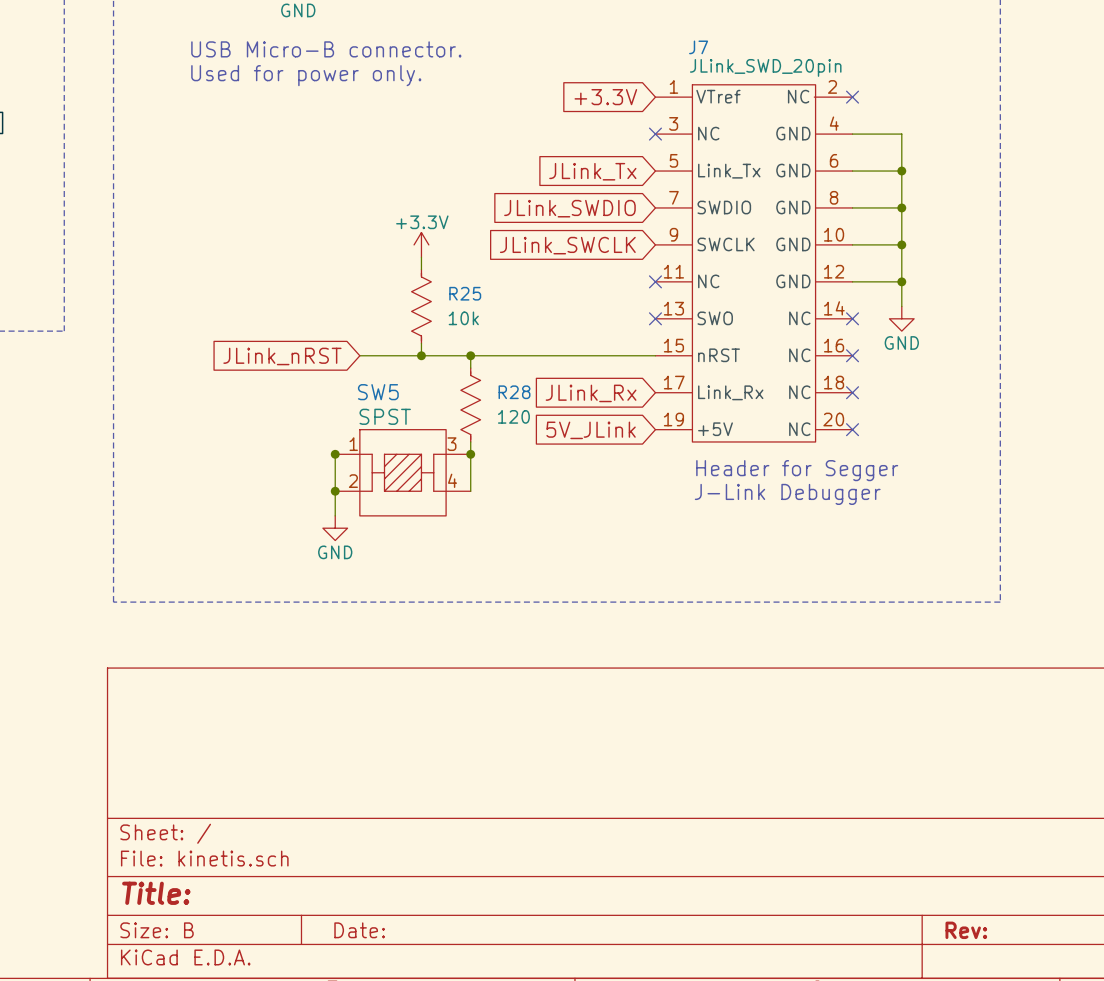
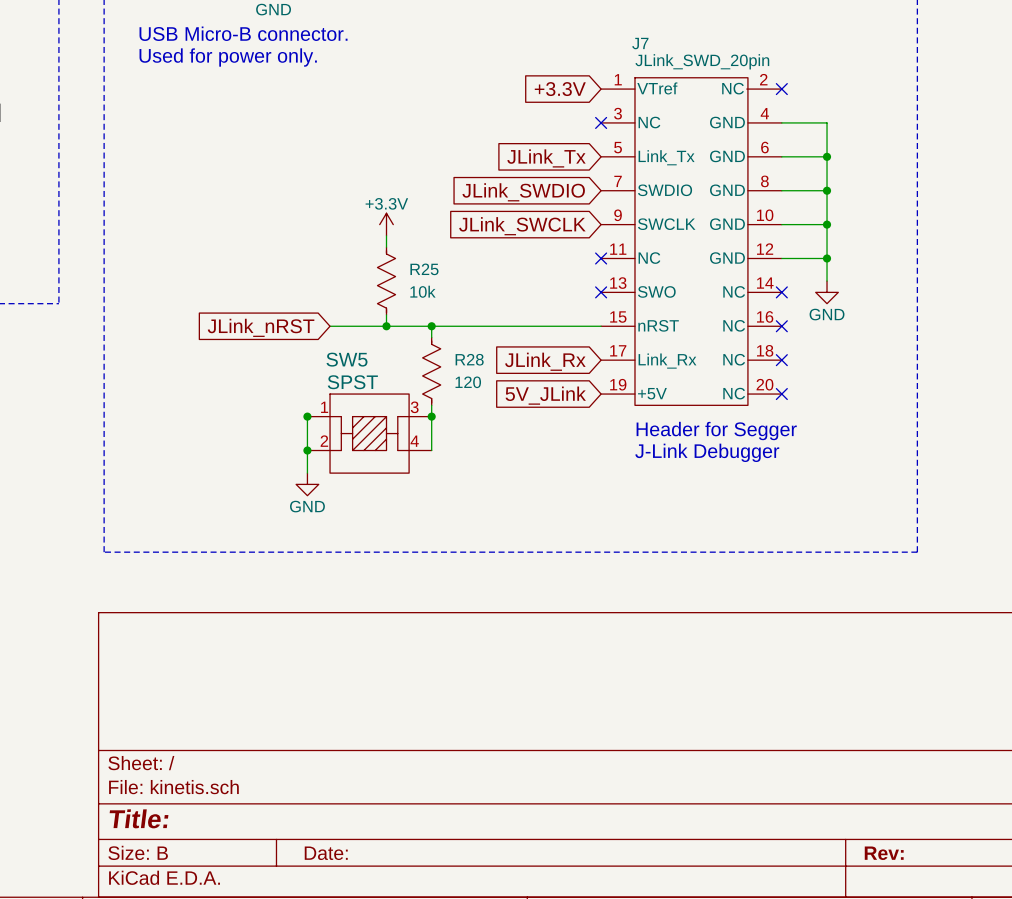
text position: USB Micro-B connector. (326, 49) -> USB Micro-B connector. (243, 33)
text position: Used for power only. (306, 75) -> Used for power only. (228, 57)

